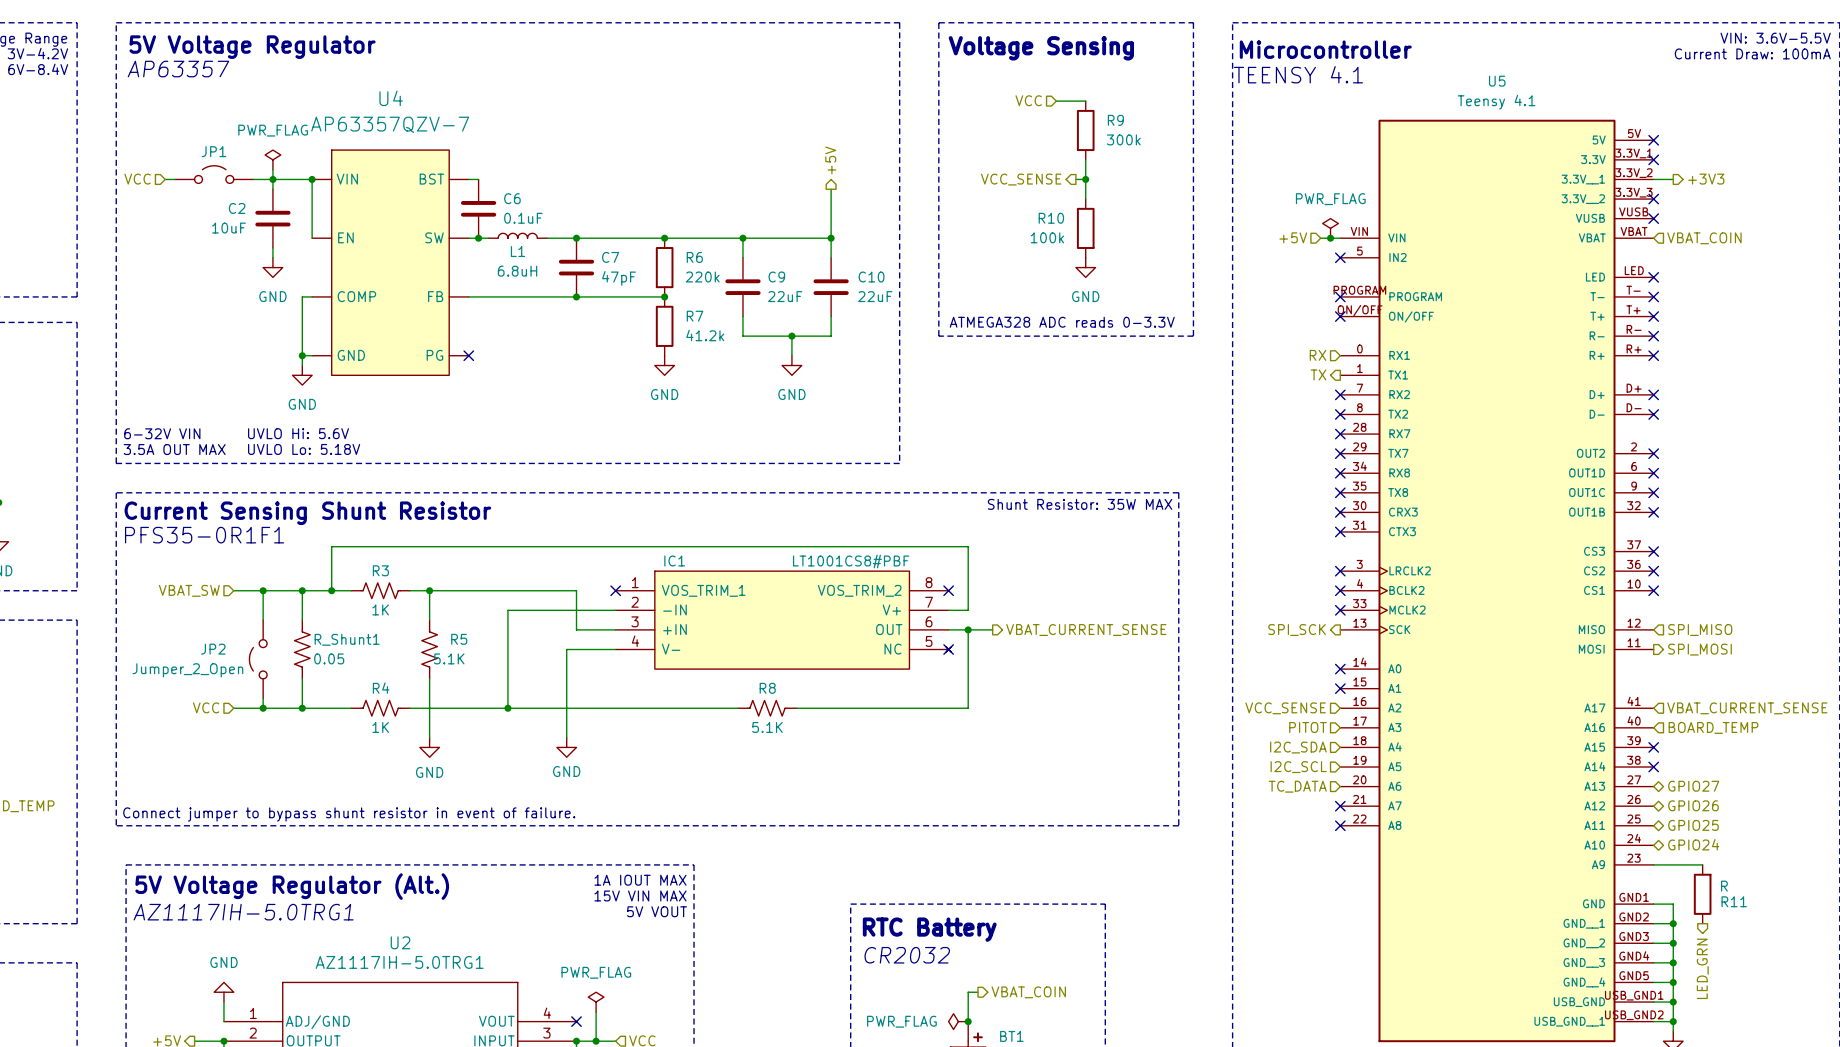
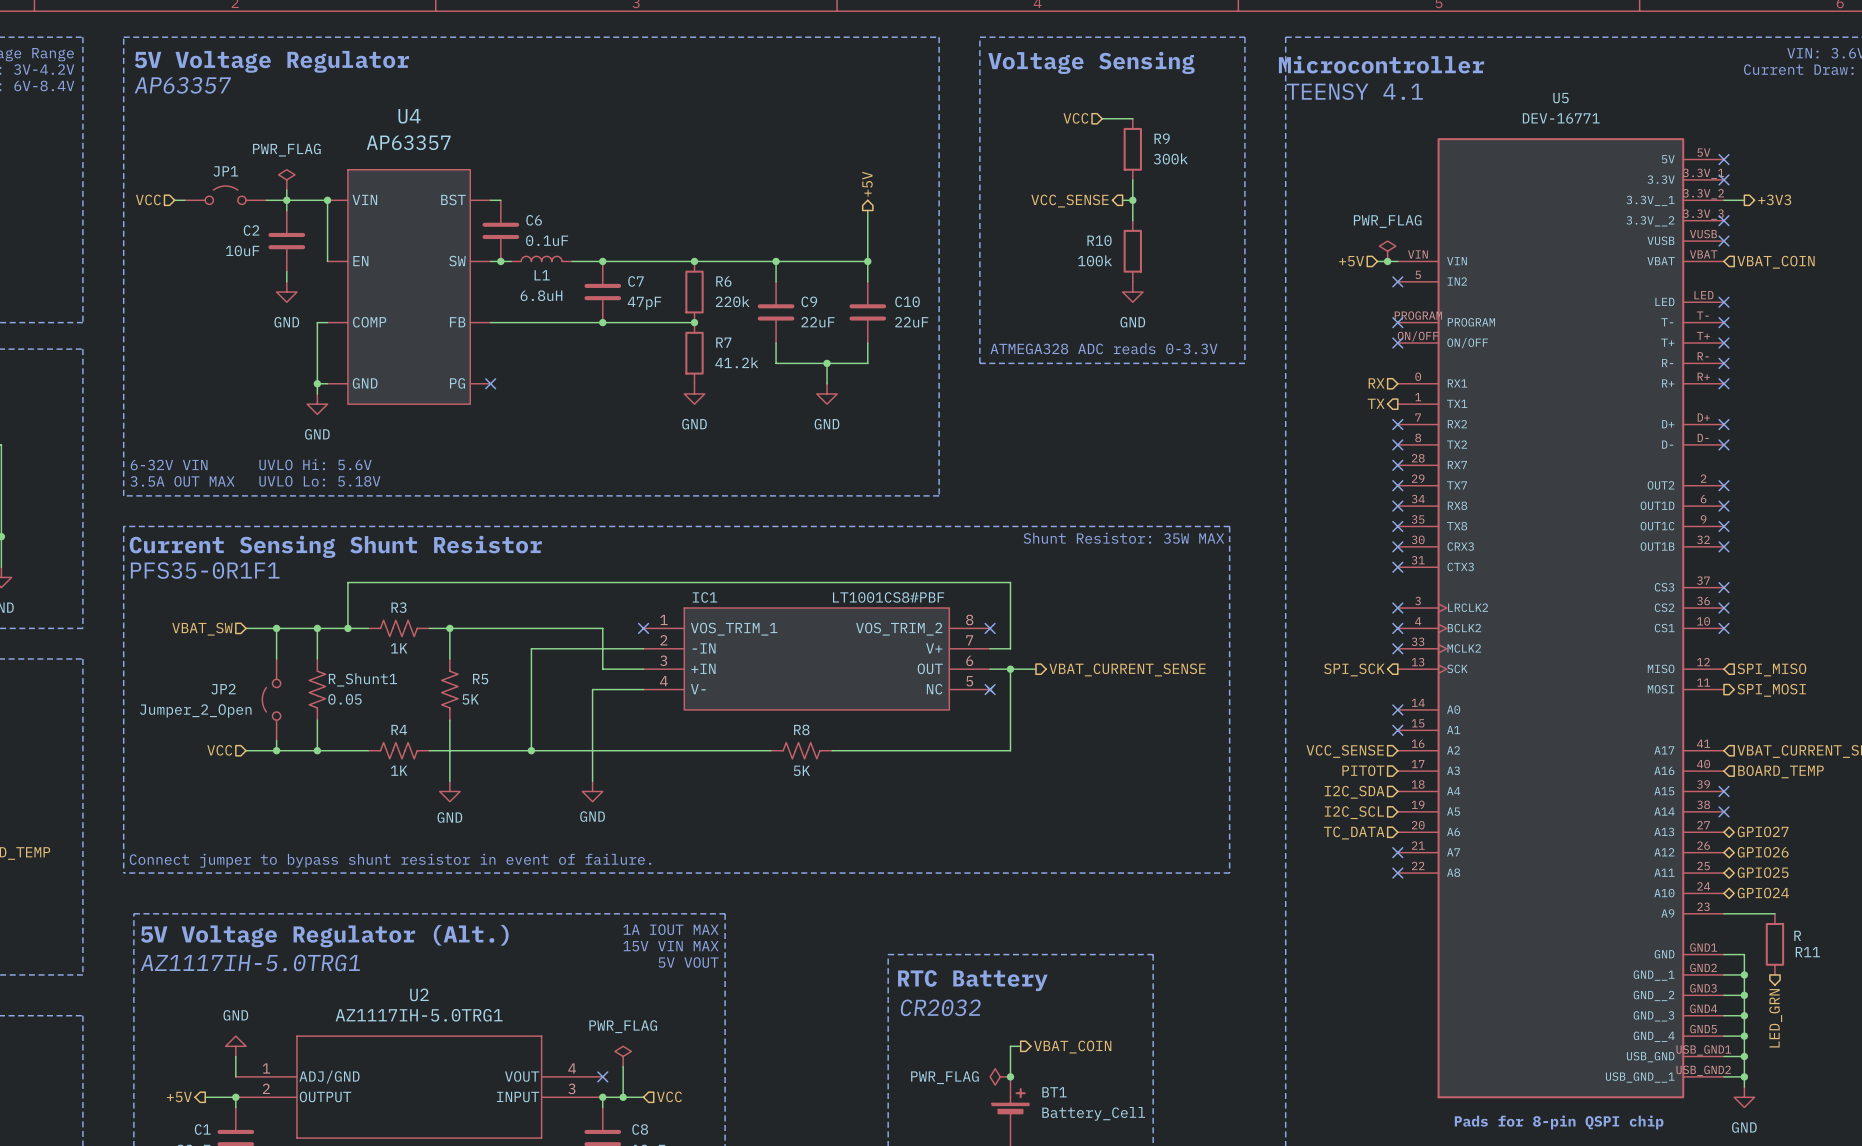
U5 value: Teensy 4.1 (1496, 102) -> DEV-16771 (1561, 118)
U4 value: AP63357QZV-7 (390, 124) -> AP63357 (408, 142)
R5 value: 5.1K (449, 658) -> 5K (470, 699)
R8 value: 5.1K (767, 727) -> 5K (801, 770)

